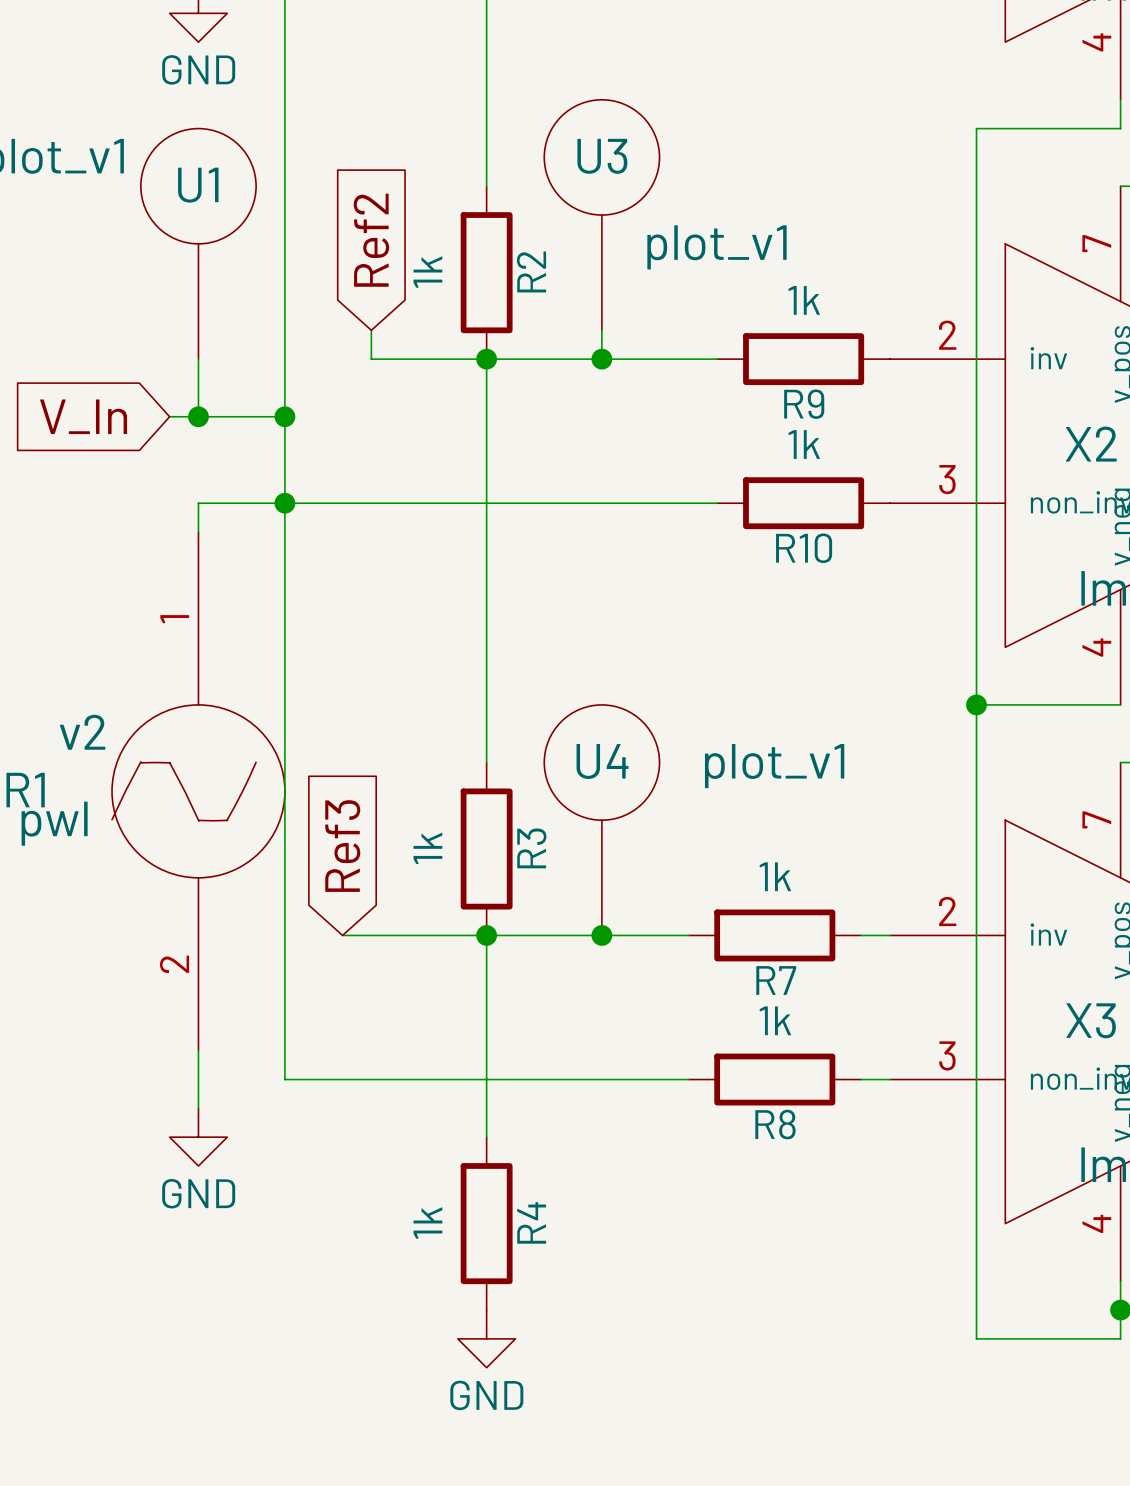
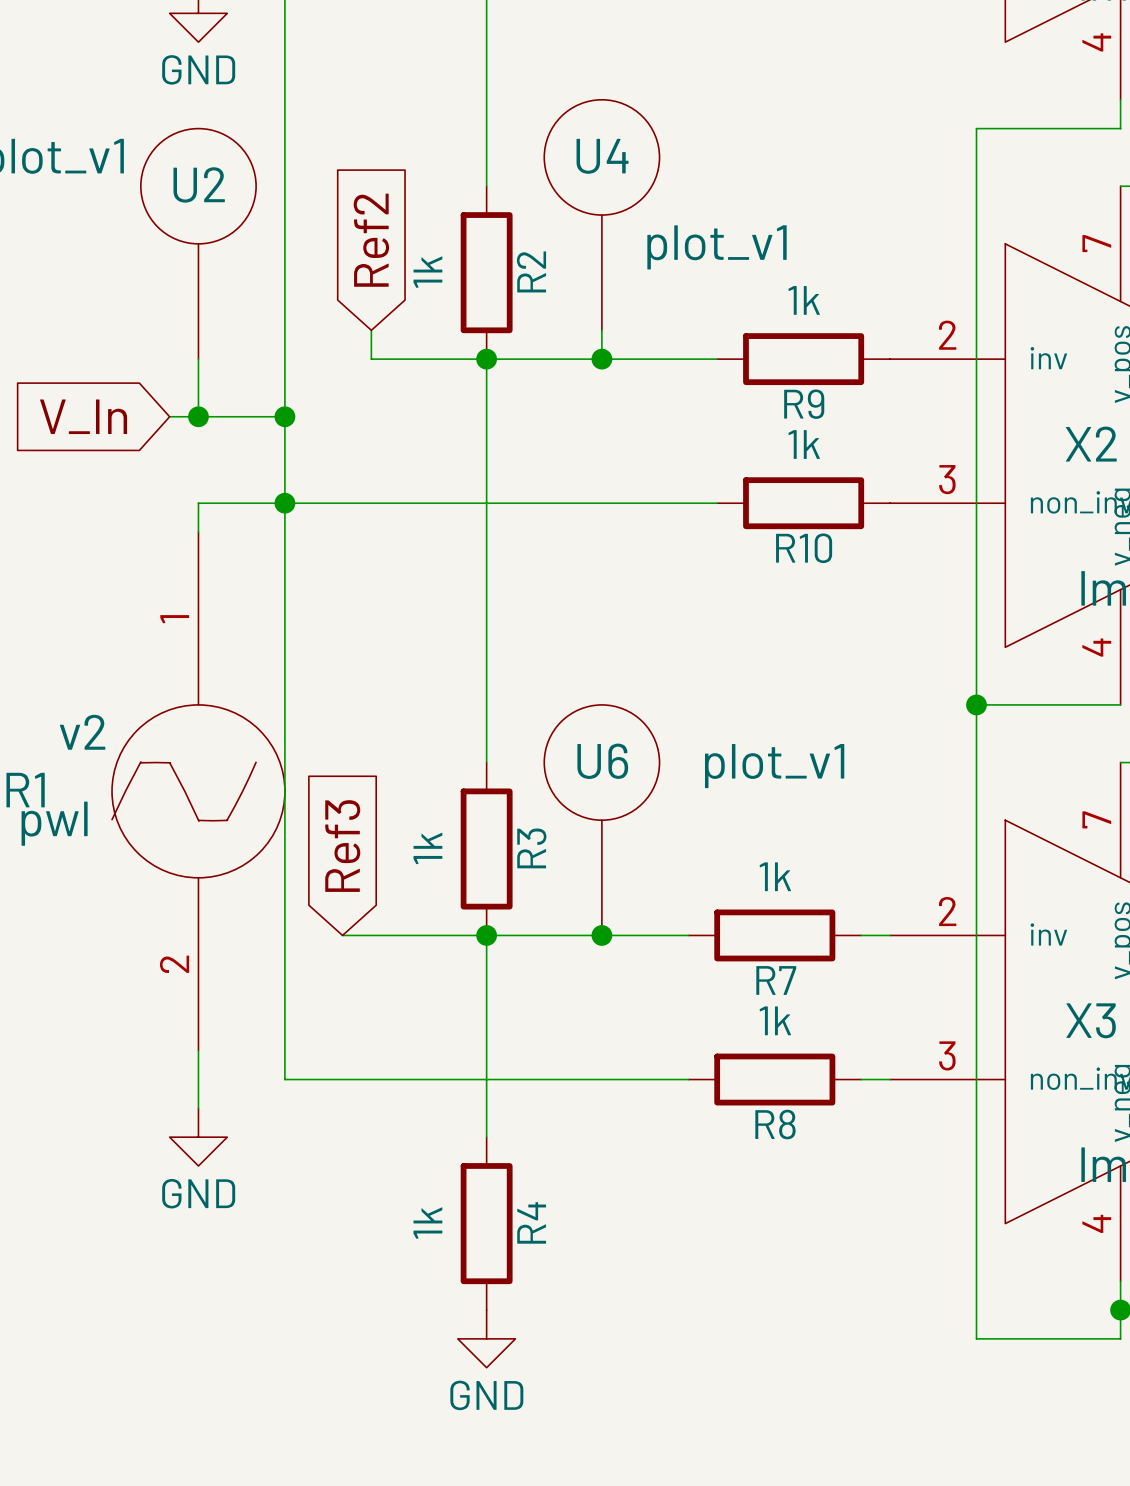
U3 name: U3 (602, 156) -> U4 (602, 156)
U1 name: U1 (198, 185) -> U2 (199, 184)
U4 name: U4 (602, 761) -> U6 (602, 761)

